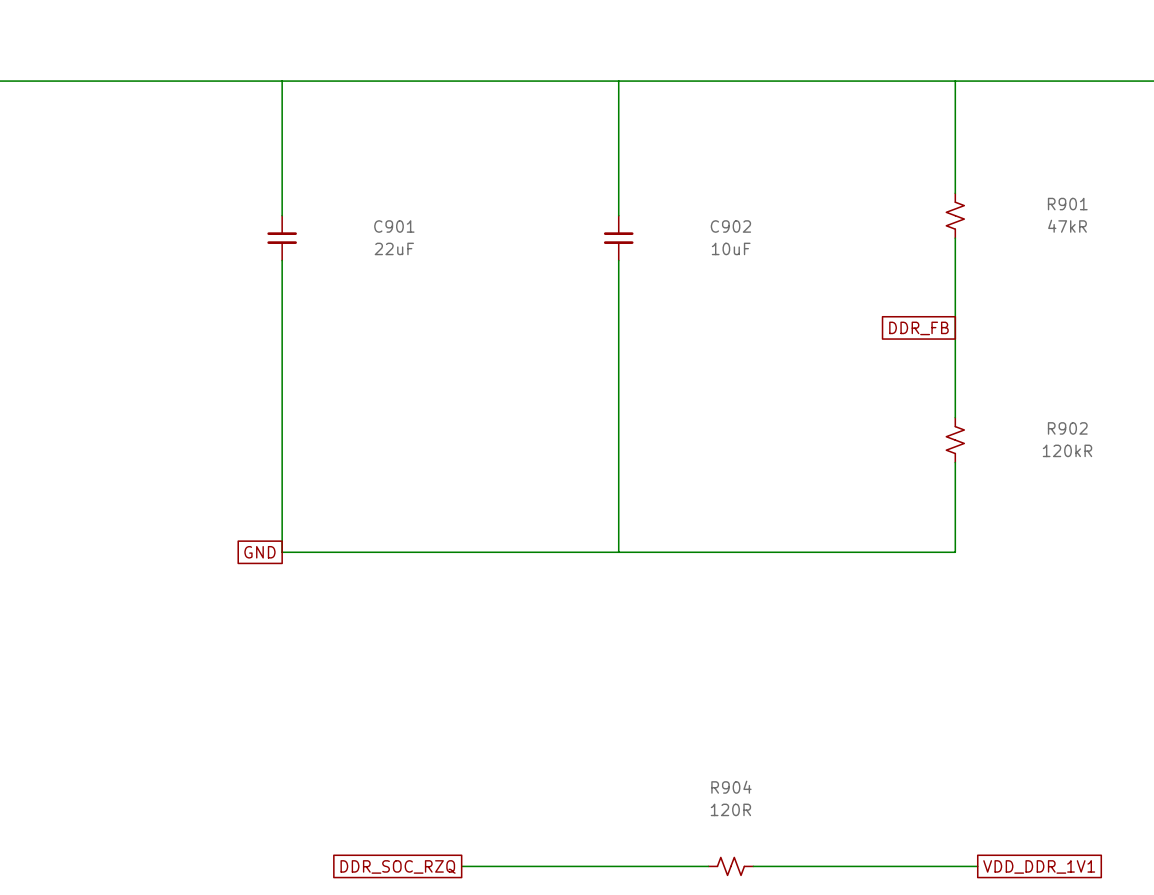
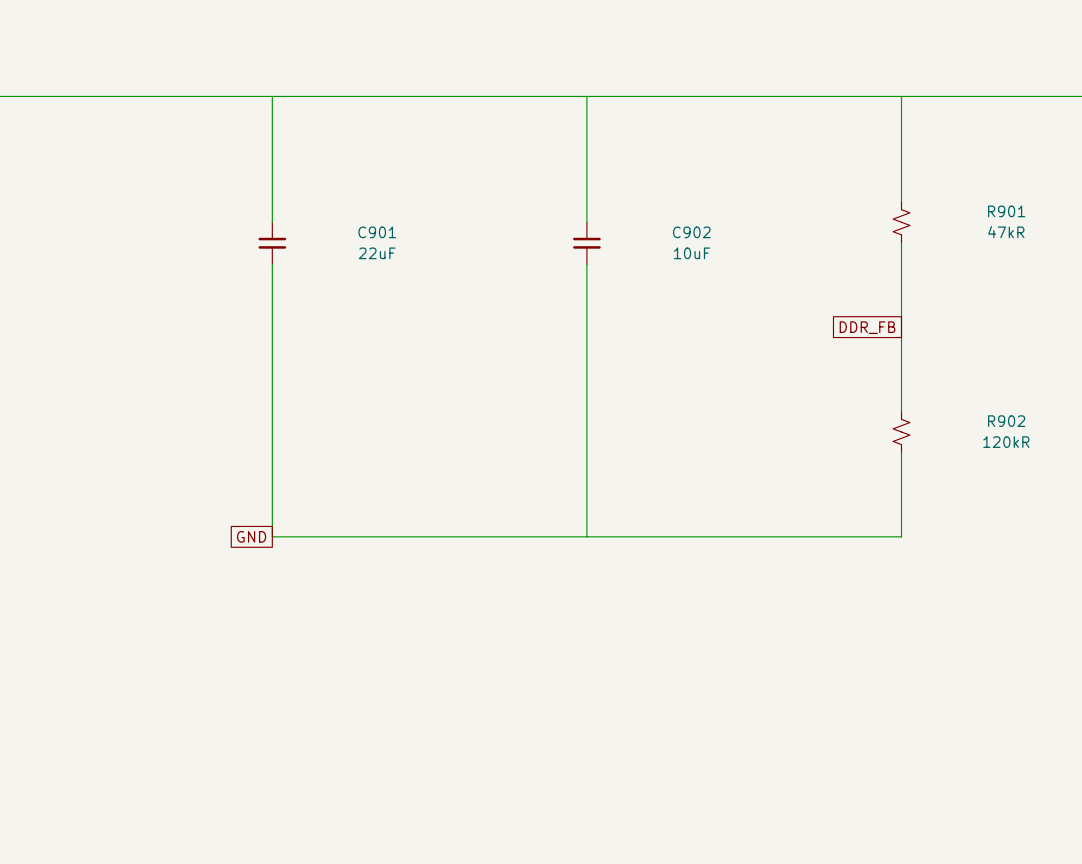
global label: DDR_SOC_RZQ (398, 866) -> none
wire: (461, 866) (708, 866) -> none
R904: 120R (730, 866) -> none
wire: (753, 866) (977, 866) -> none
global label: VDD_DDR_1V1 (1039, 866) -> none

